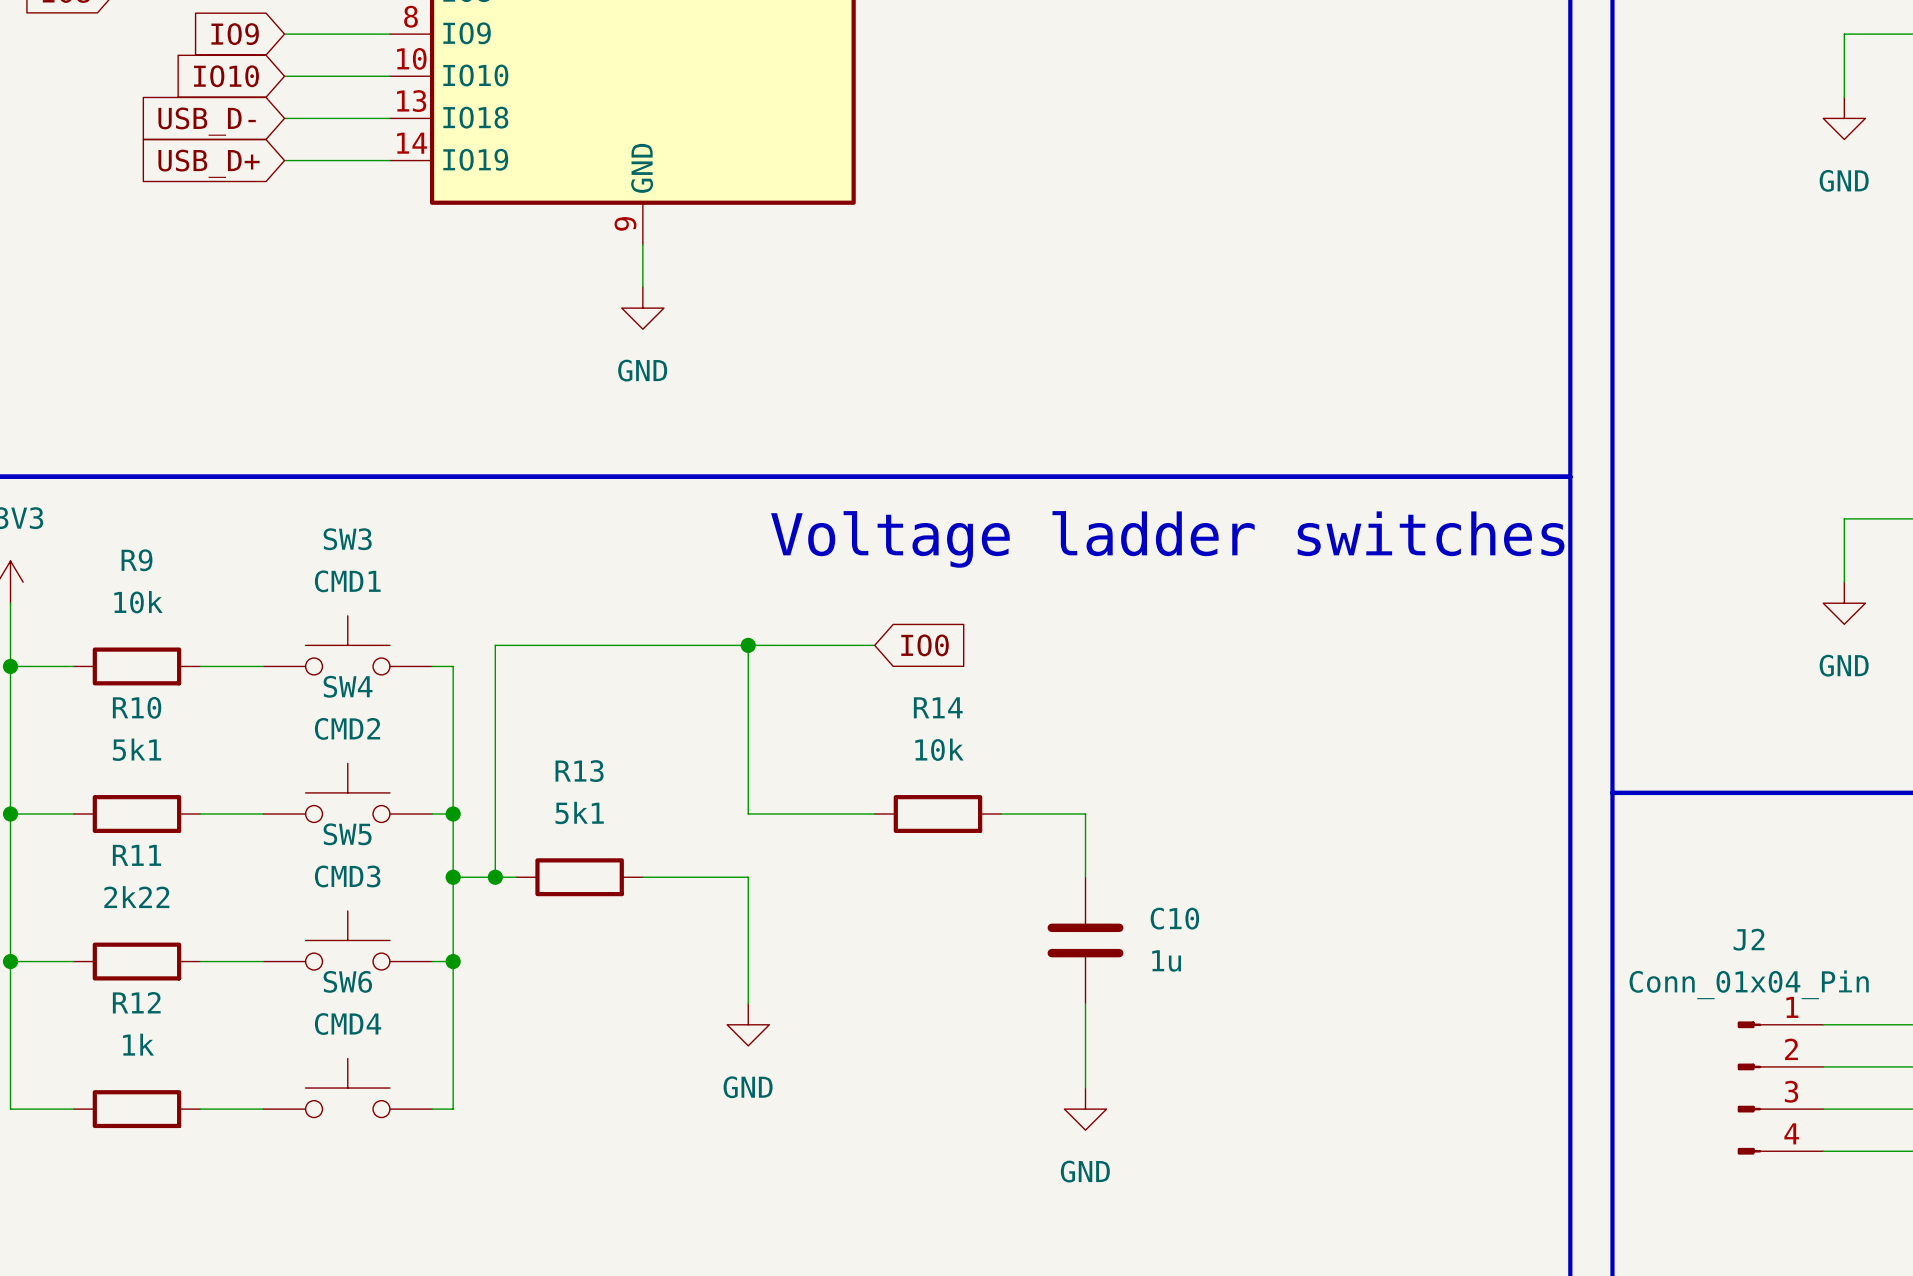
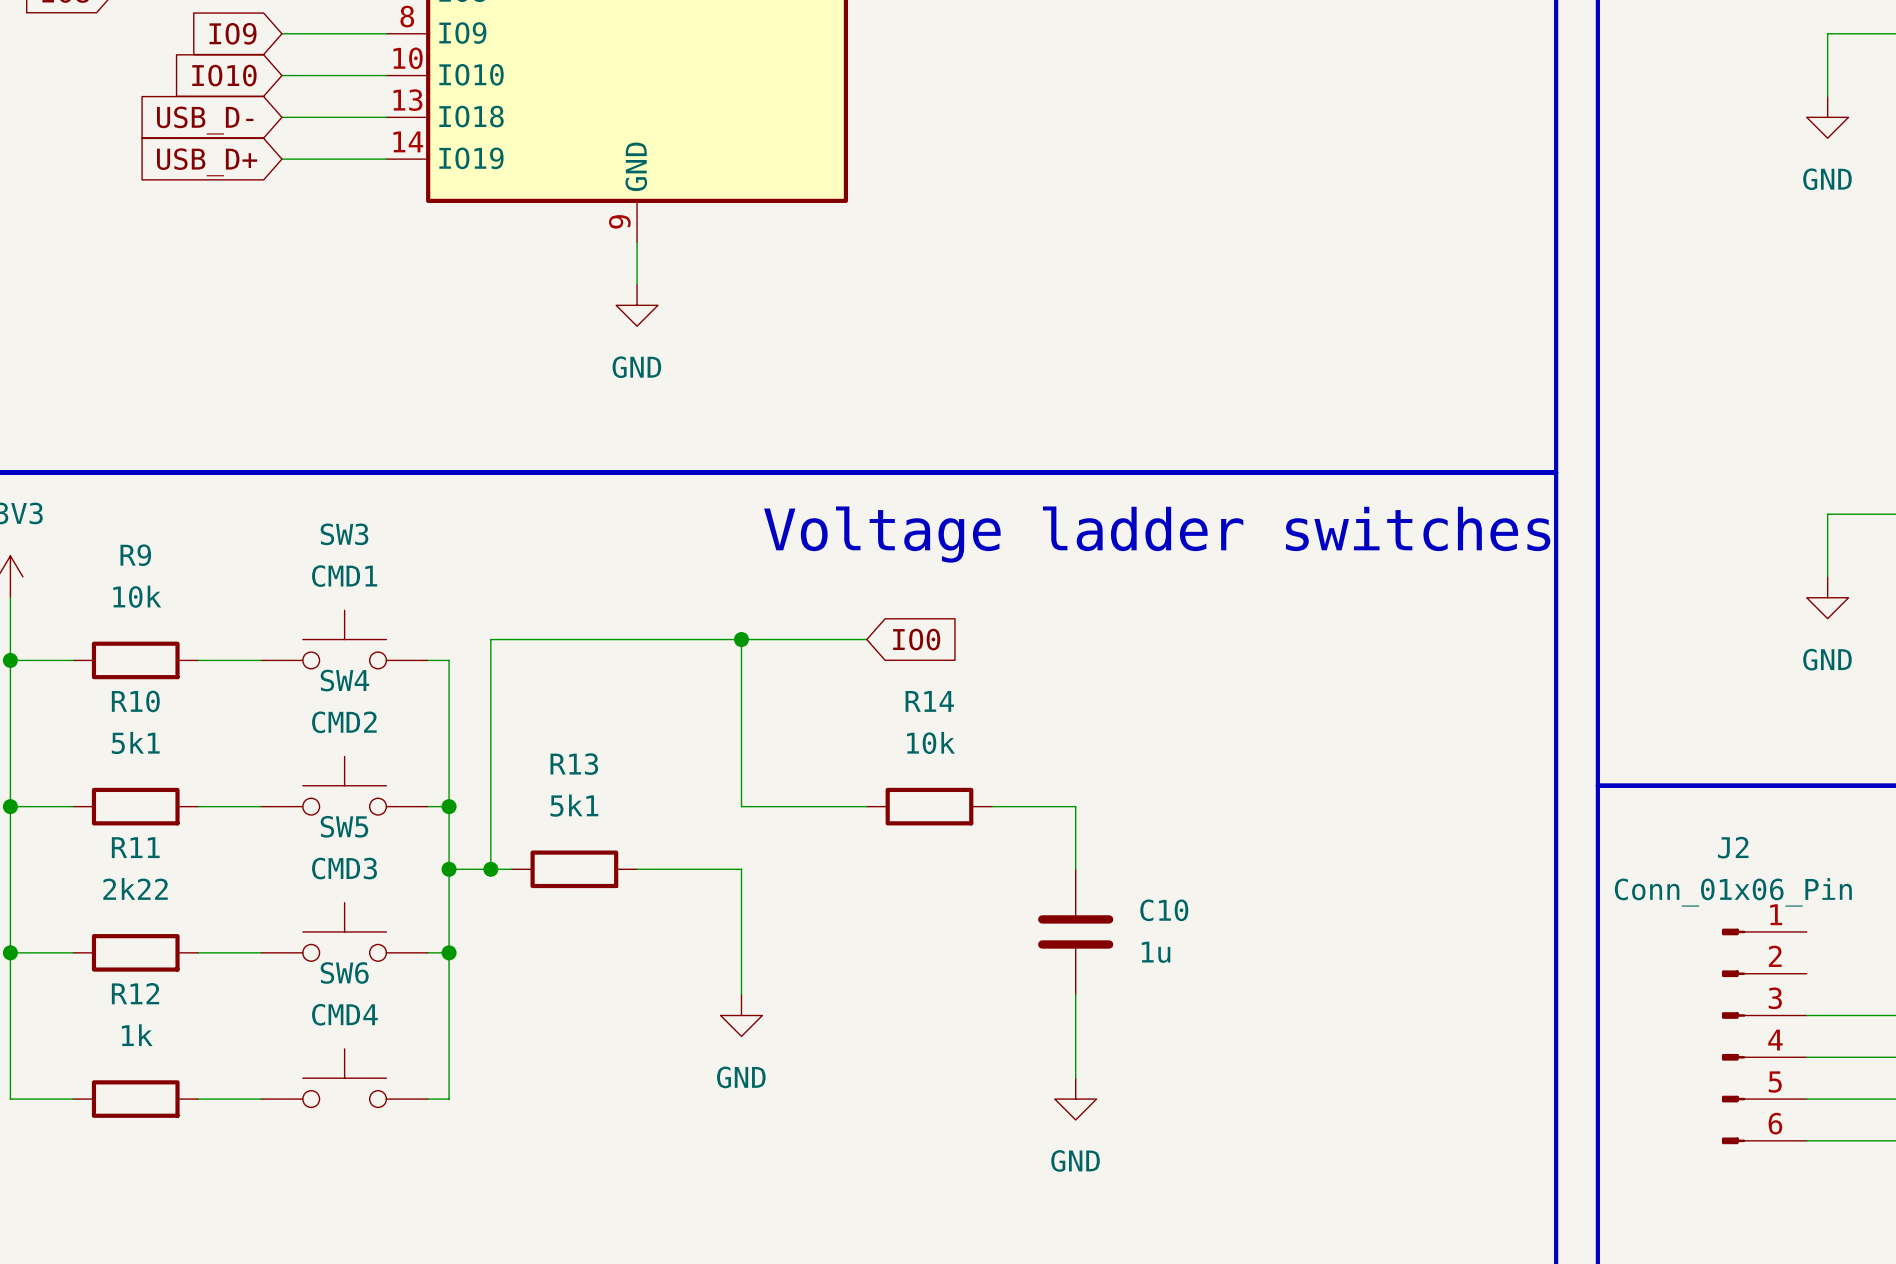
J2 name position: J2 (1749, 939) -> J2 (1733, 847)
J2 value: Conn_01x04_Pin (1749, 984) -> Conn_01x06_Pin (1733, 892)
J2 symbol: [1737, 1021, 1824, 1155] -> [1721, 928, 1807, 1145]

